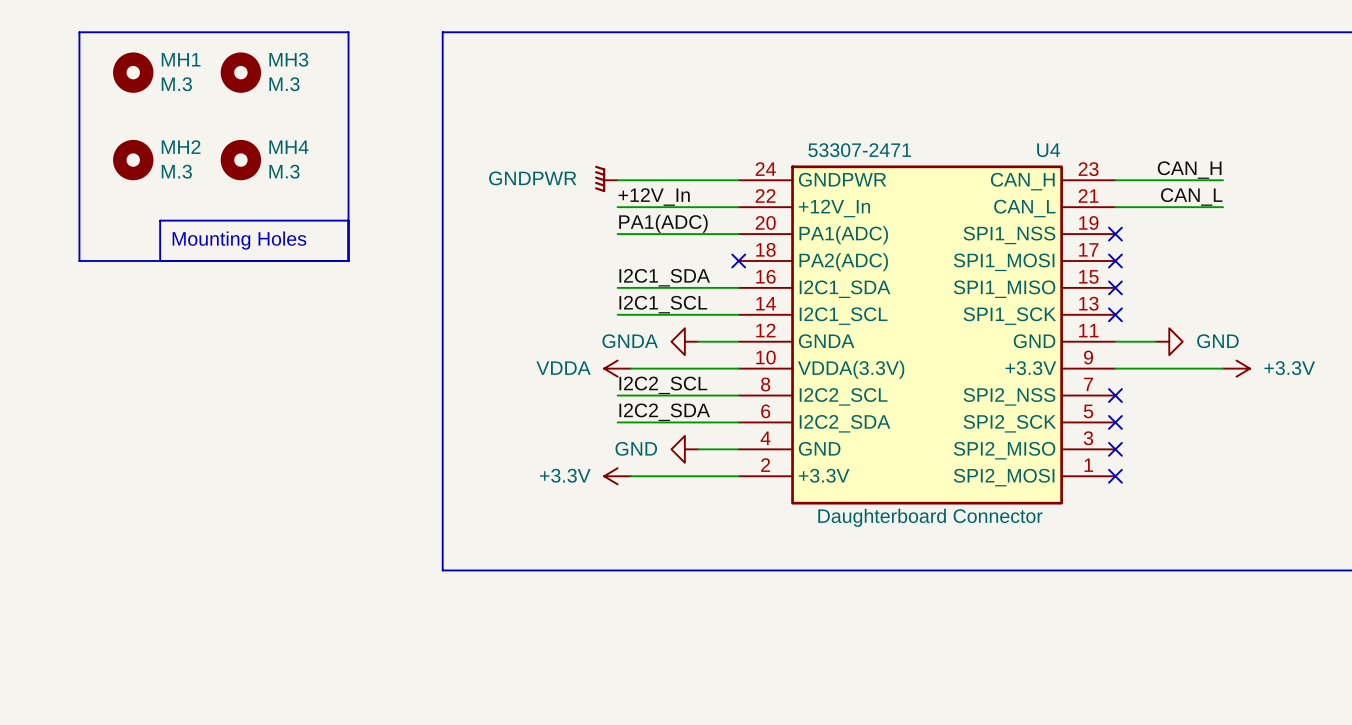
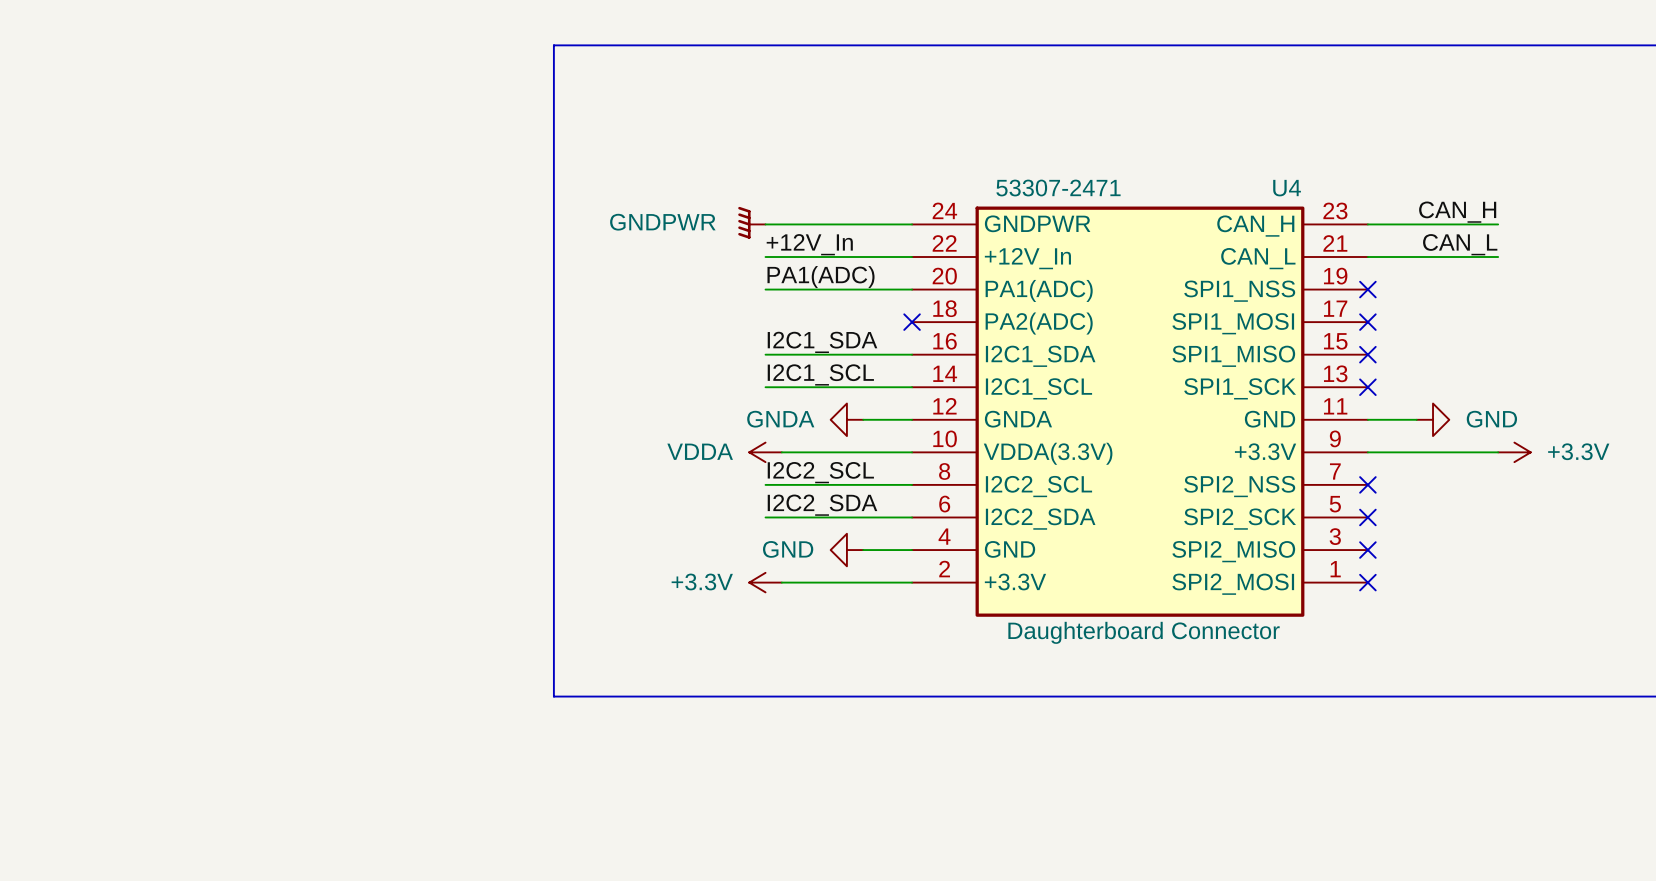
line: (79, 32) (348, 32) (348, 260) (79, 260) (79, 32) -> none
MH1: M.3 (133, 72) -> none
MH3: M.3 (240, 72) -> none
MH2: M.3 (133, 160) -> none
MH4: M.3 (240, 160) -> none
line: (348, 220) (160, 220) (160, 260) -> none
text: Mounting Holes (239, 240) -> none

